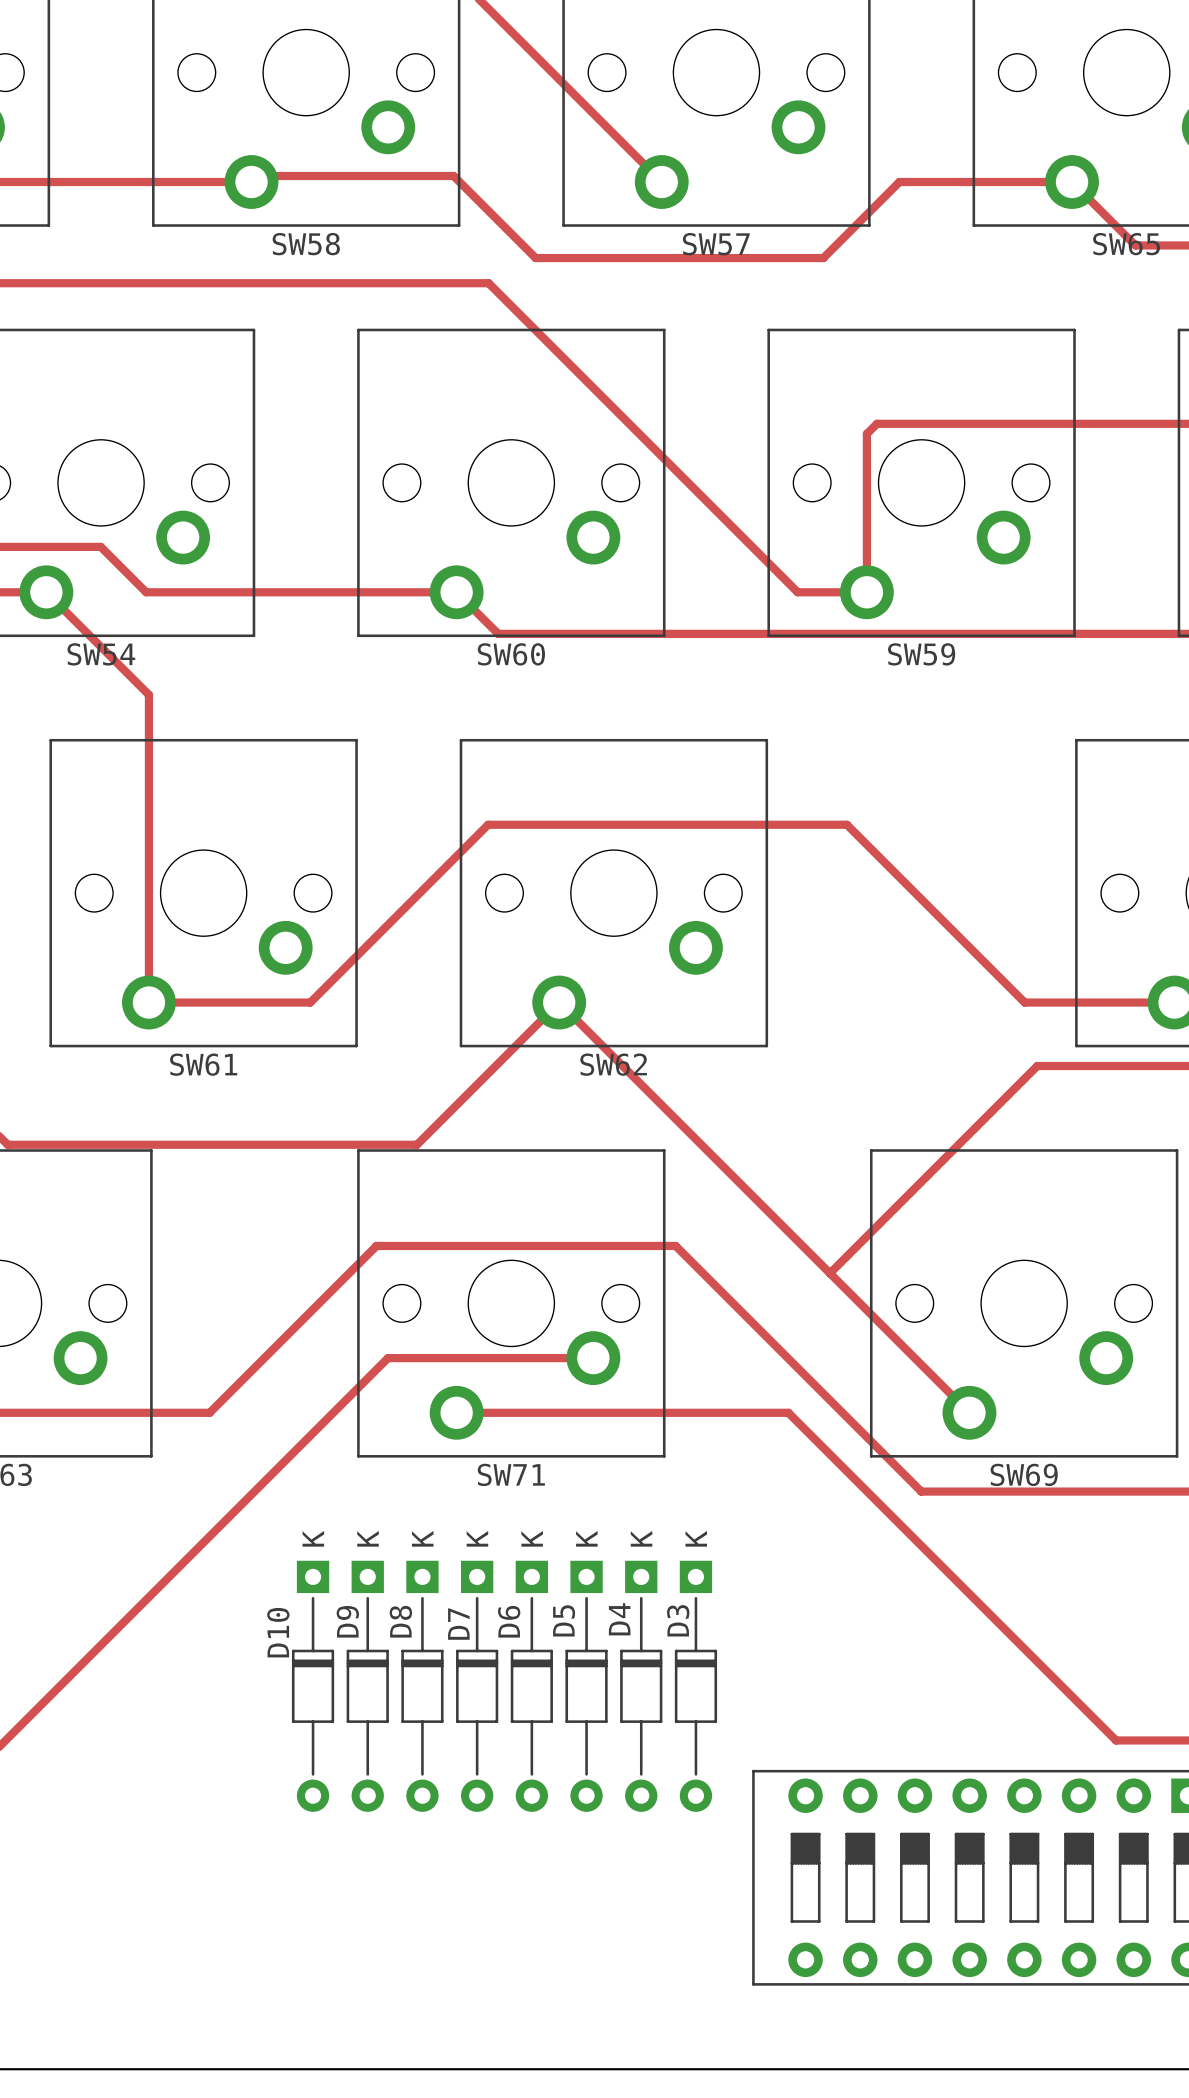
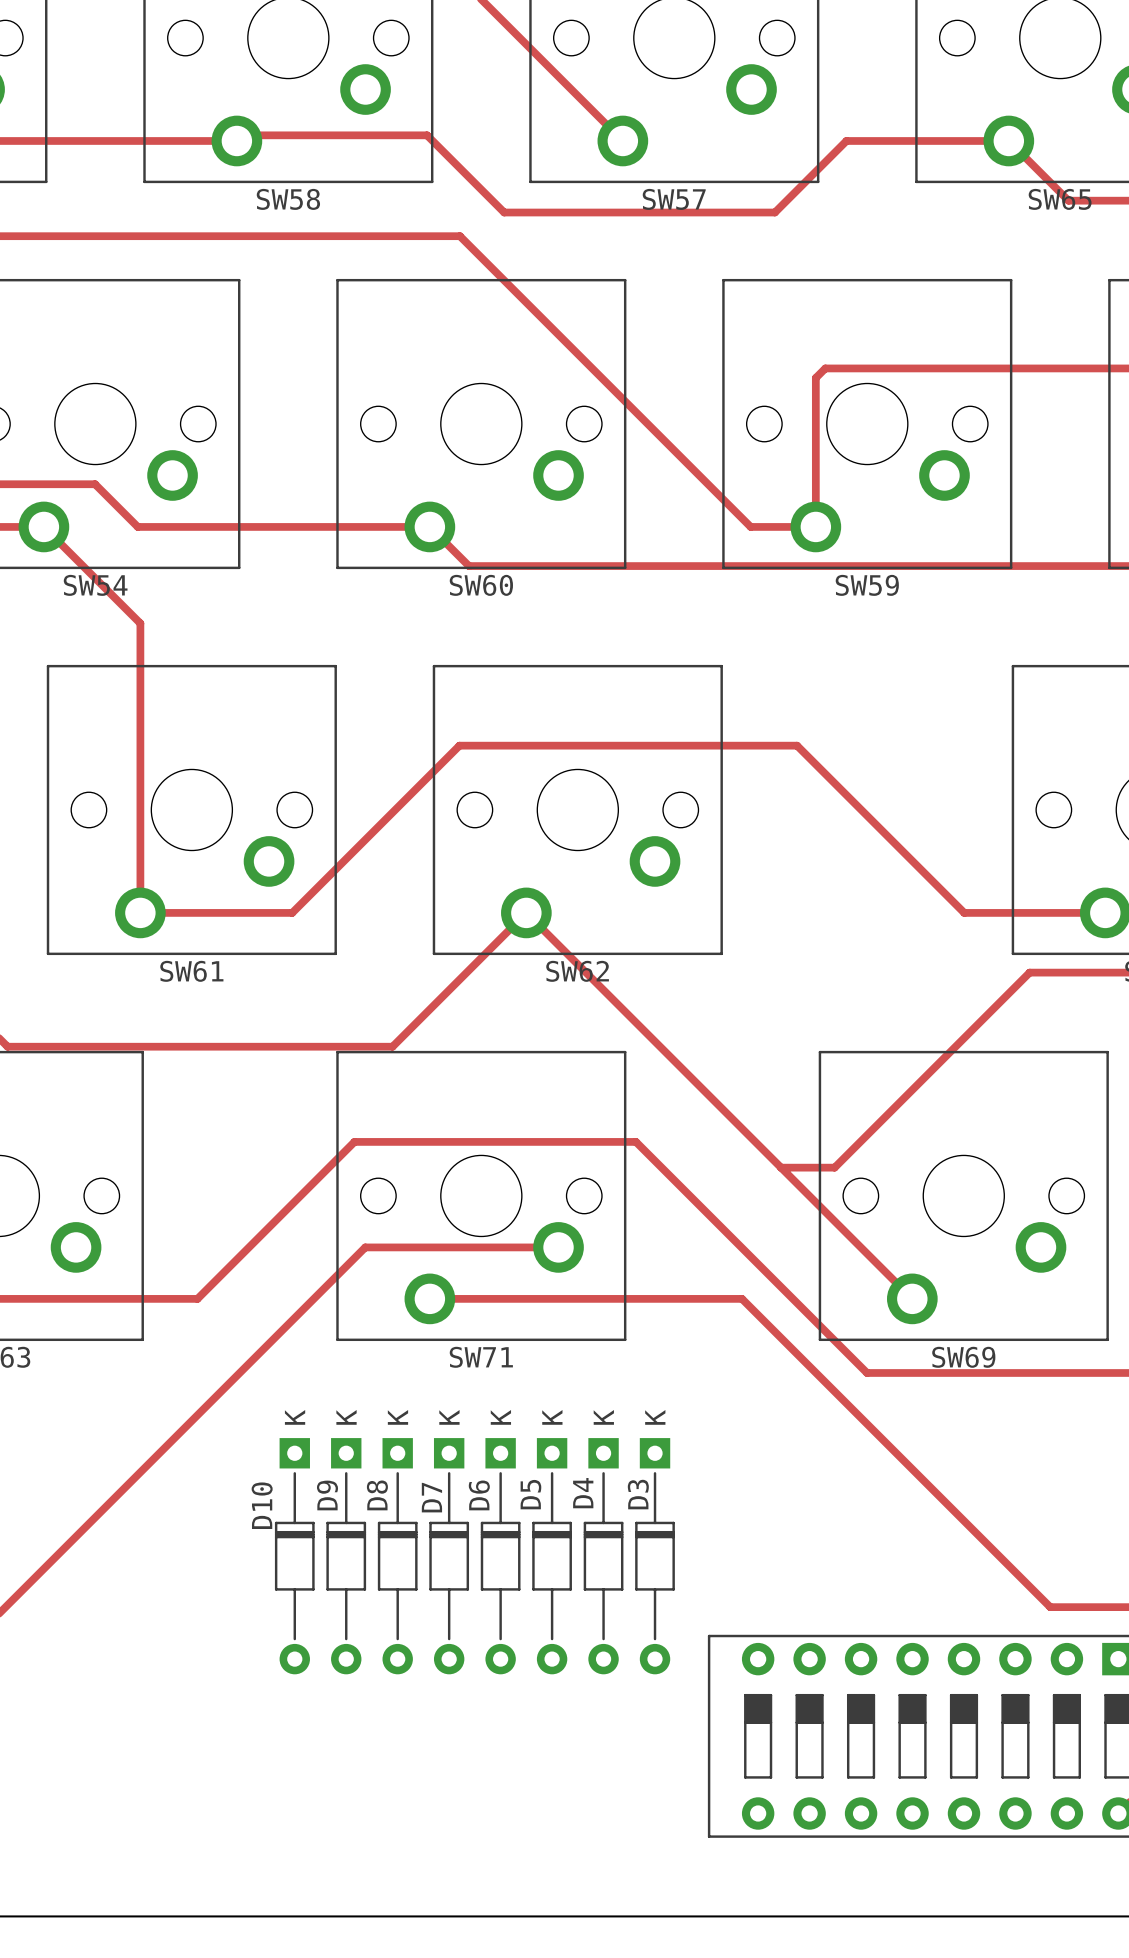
track: (1094, 1066) (1037, 1066) (829, 1273) -> (1029, 972) (834, 1167) (781, 1167)

